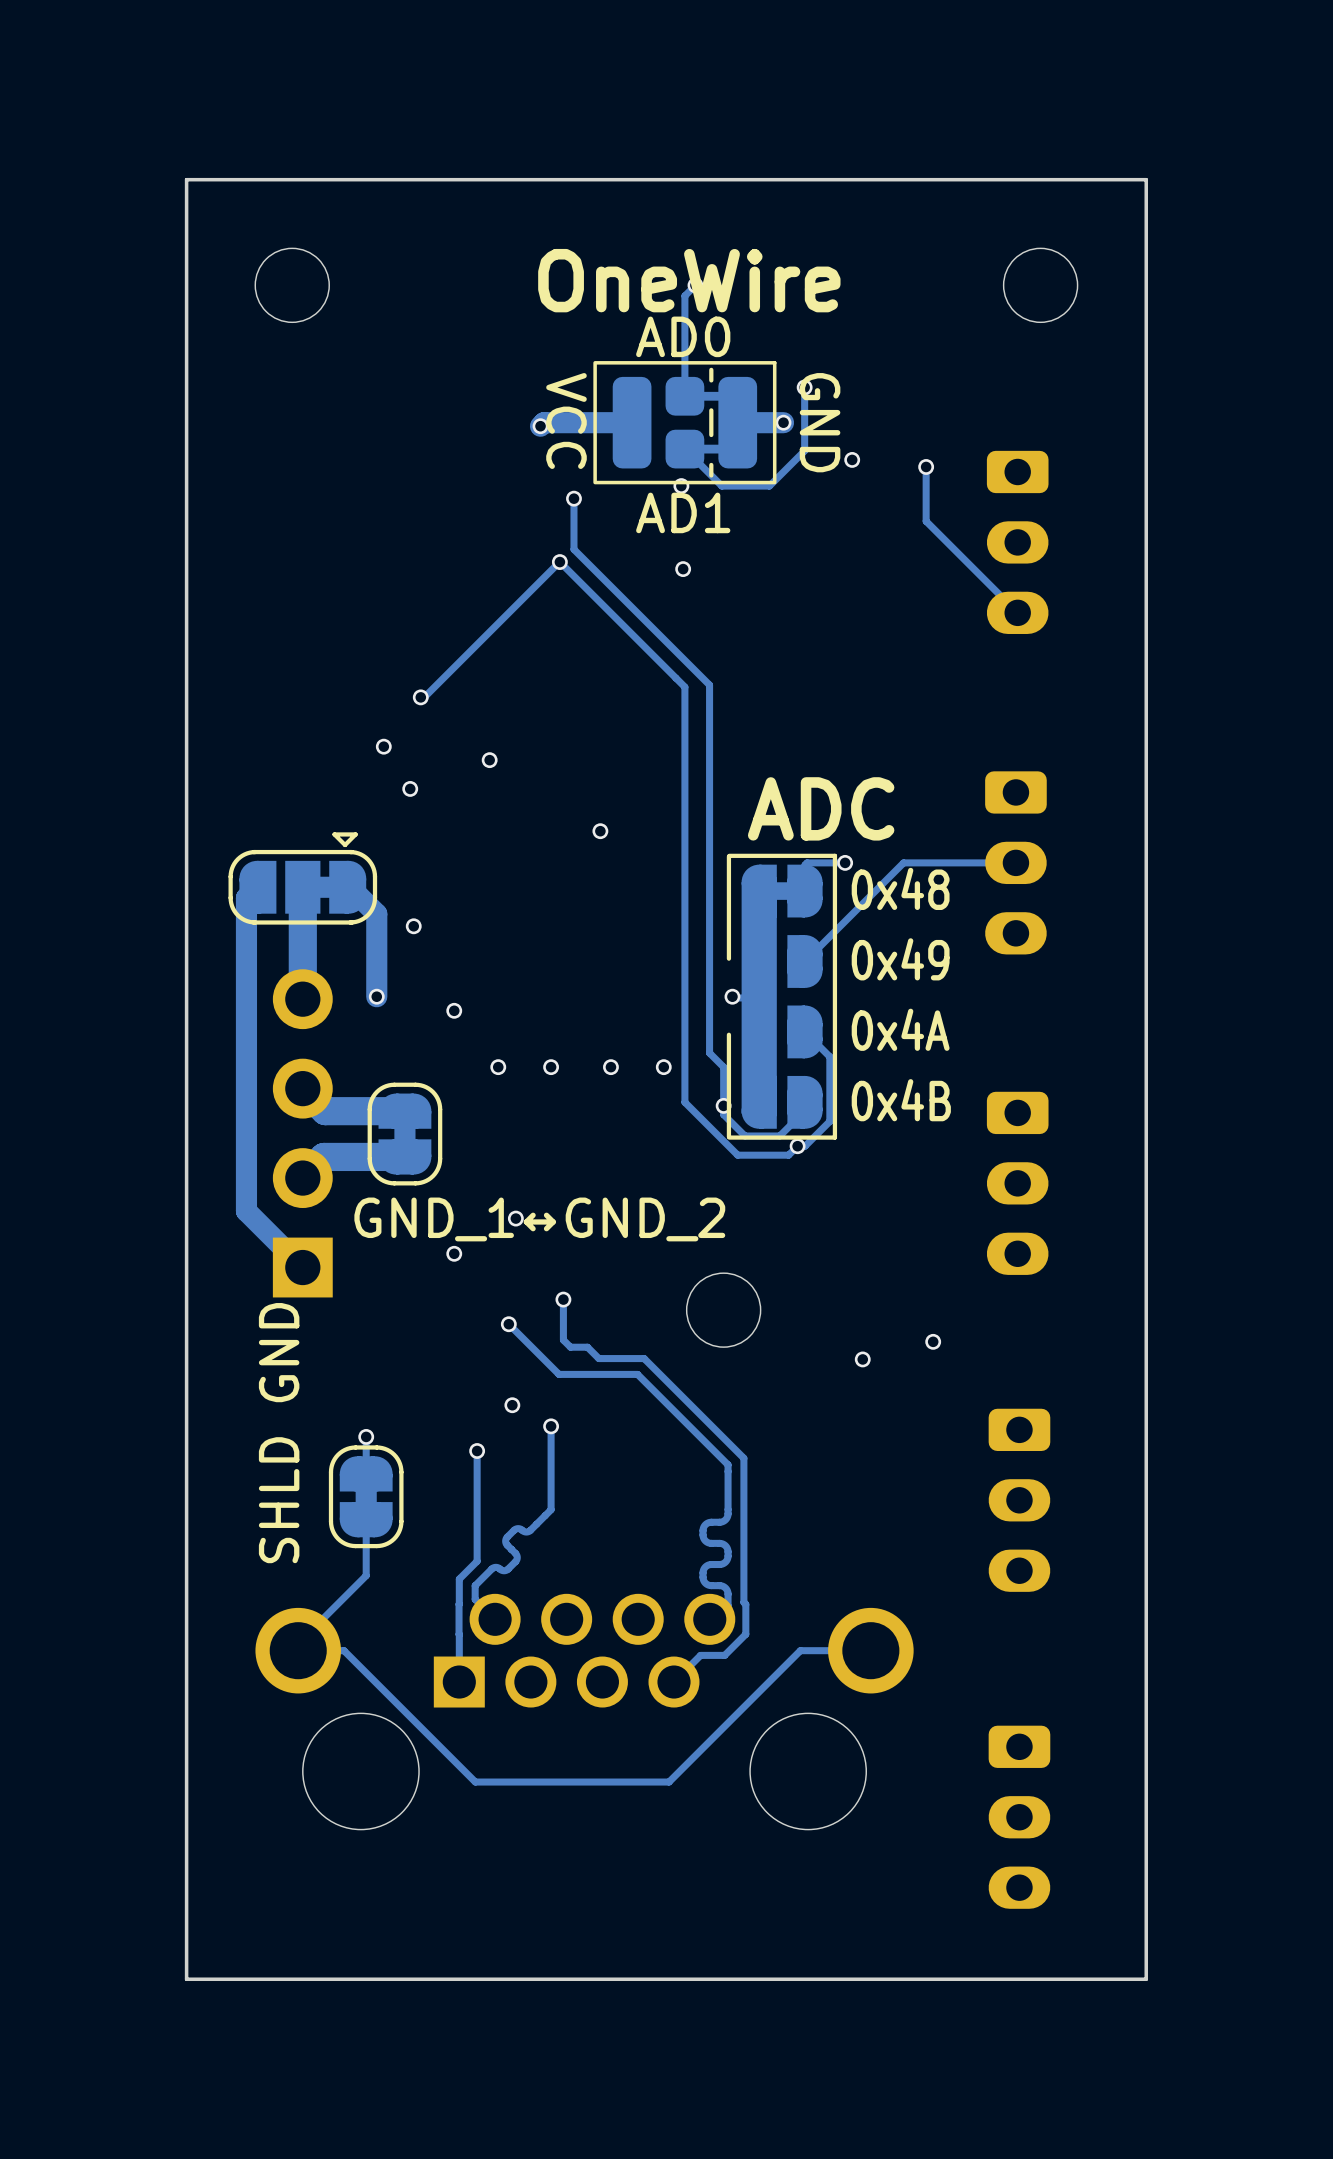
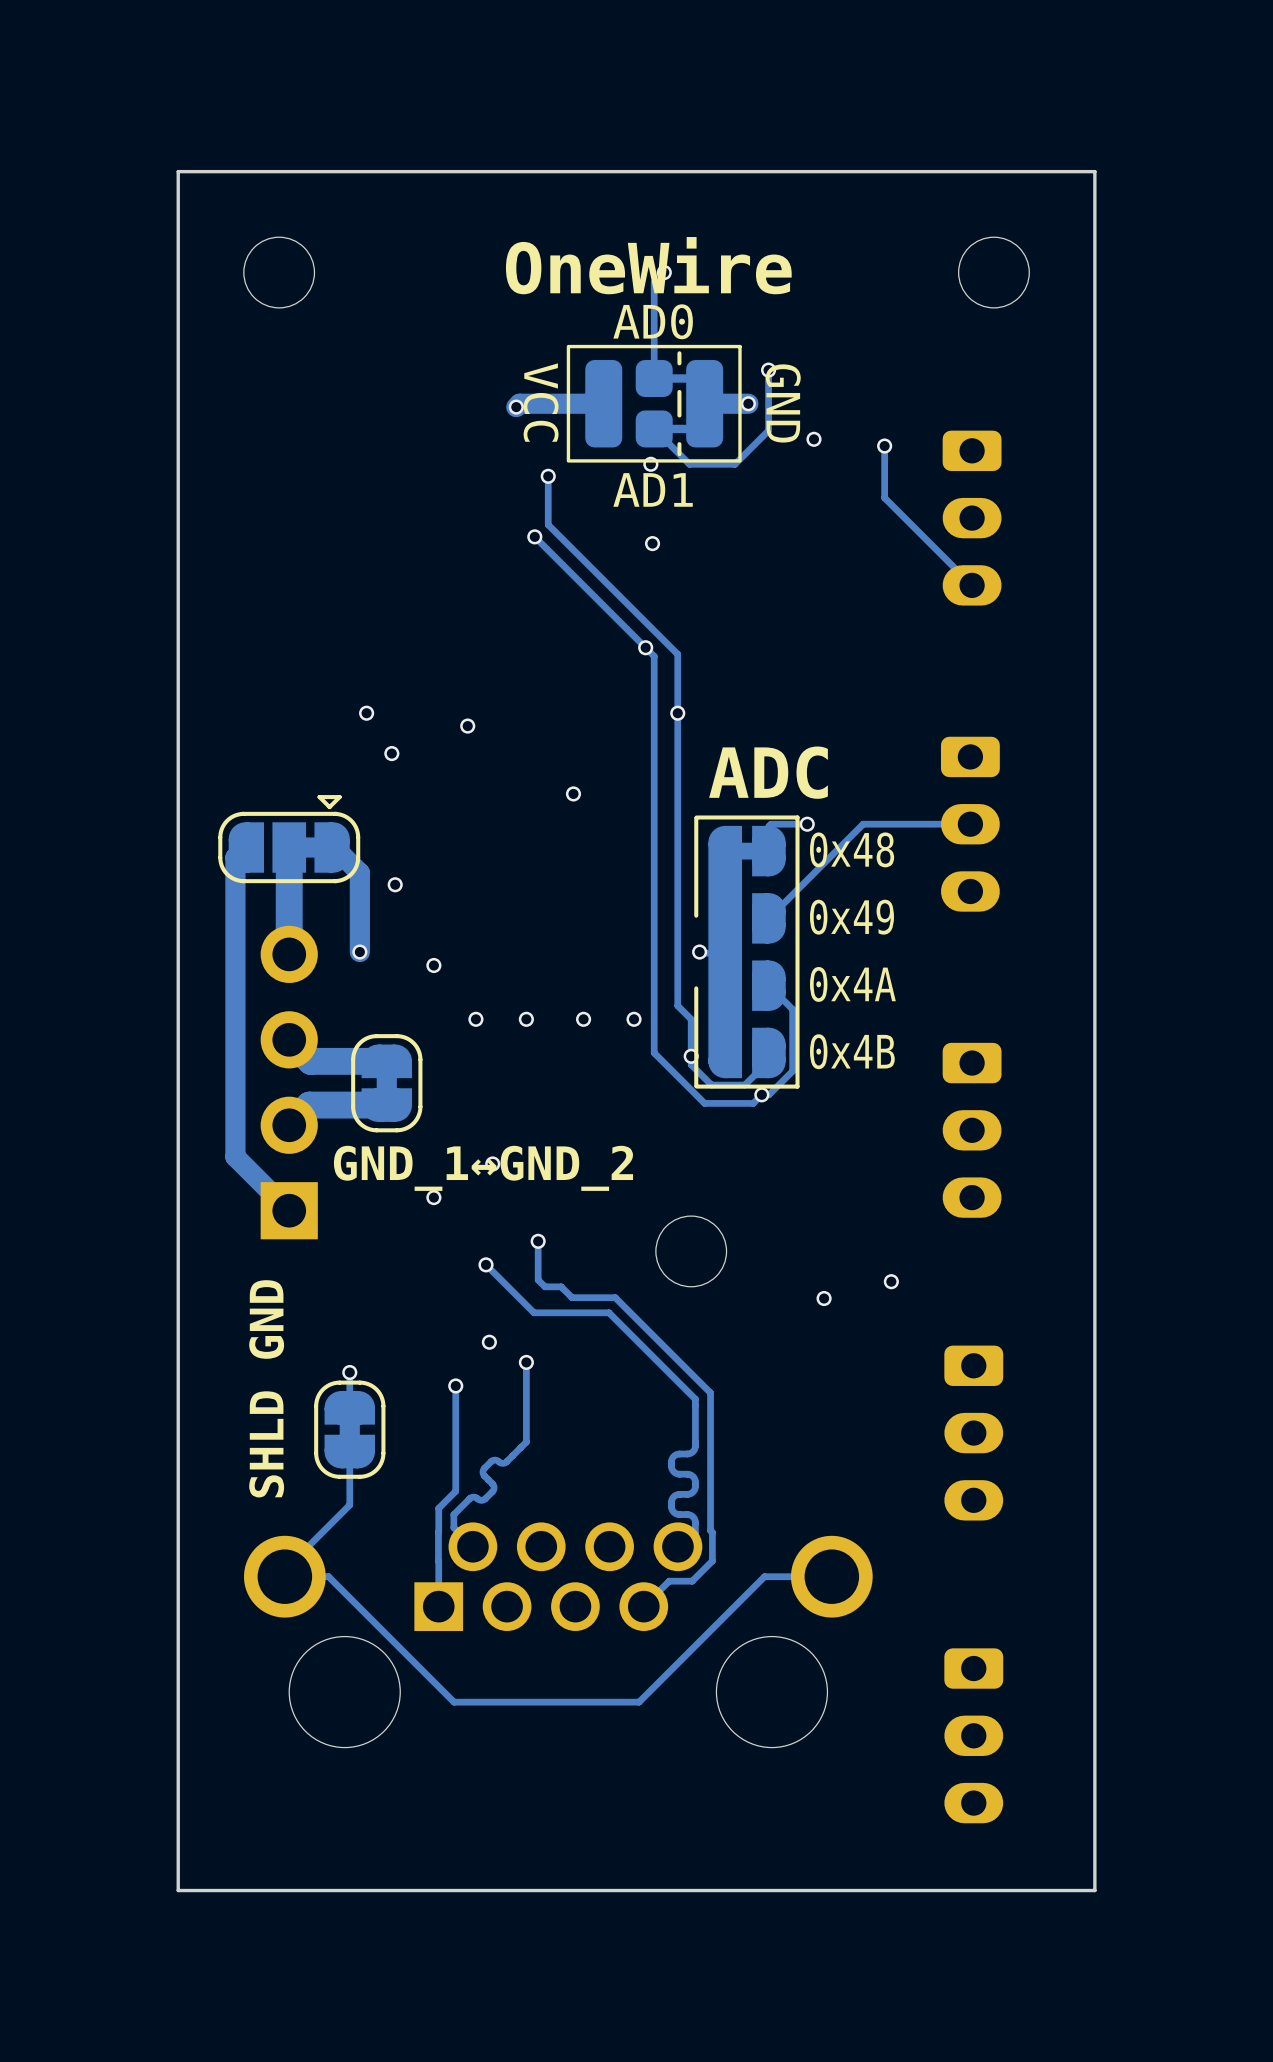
track: (559, 562) (424, 697) (420, 697) -> none
via: none -> (645, 647)
via: (420, 697) -> none
via: none -> (677, 713)

